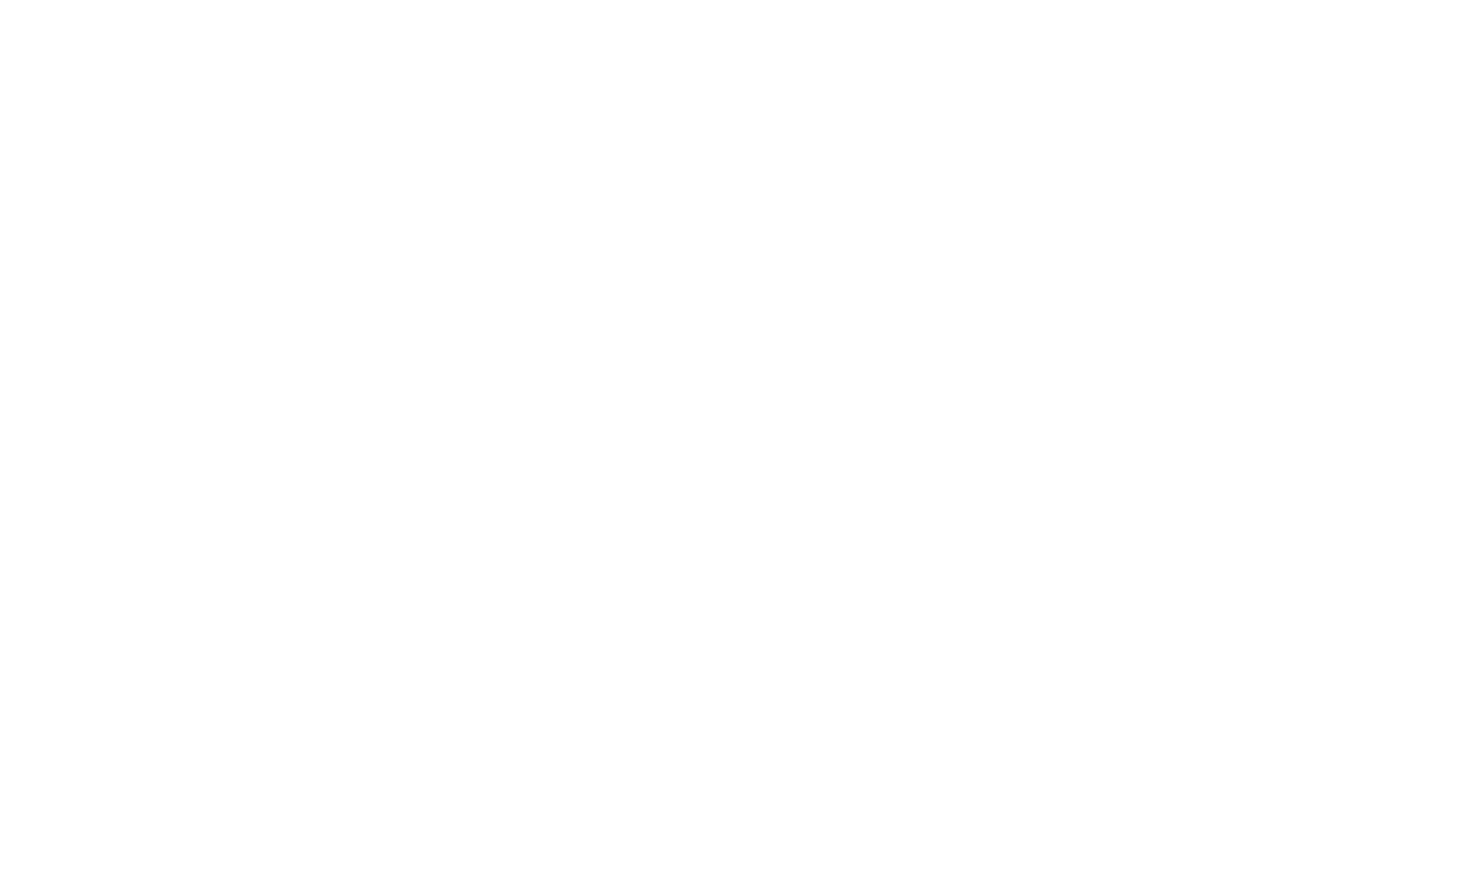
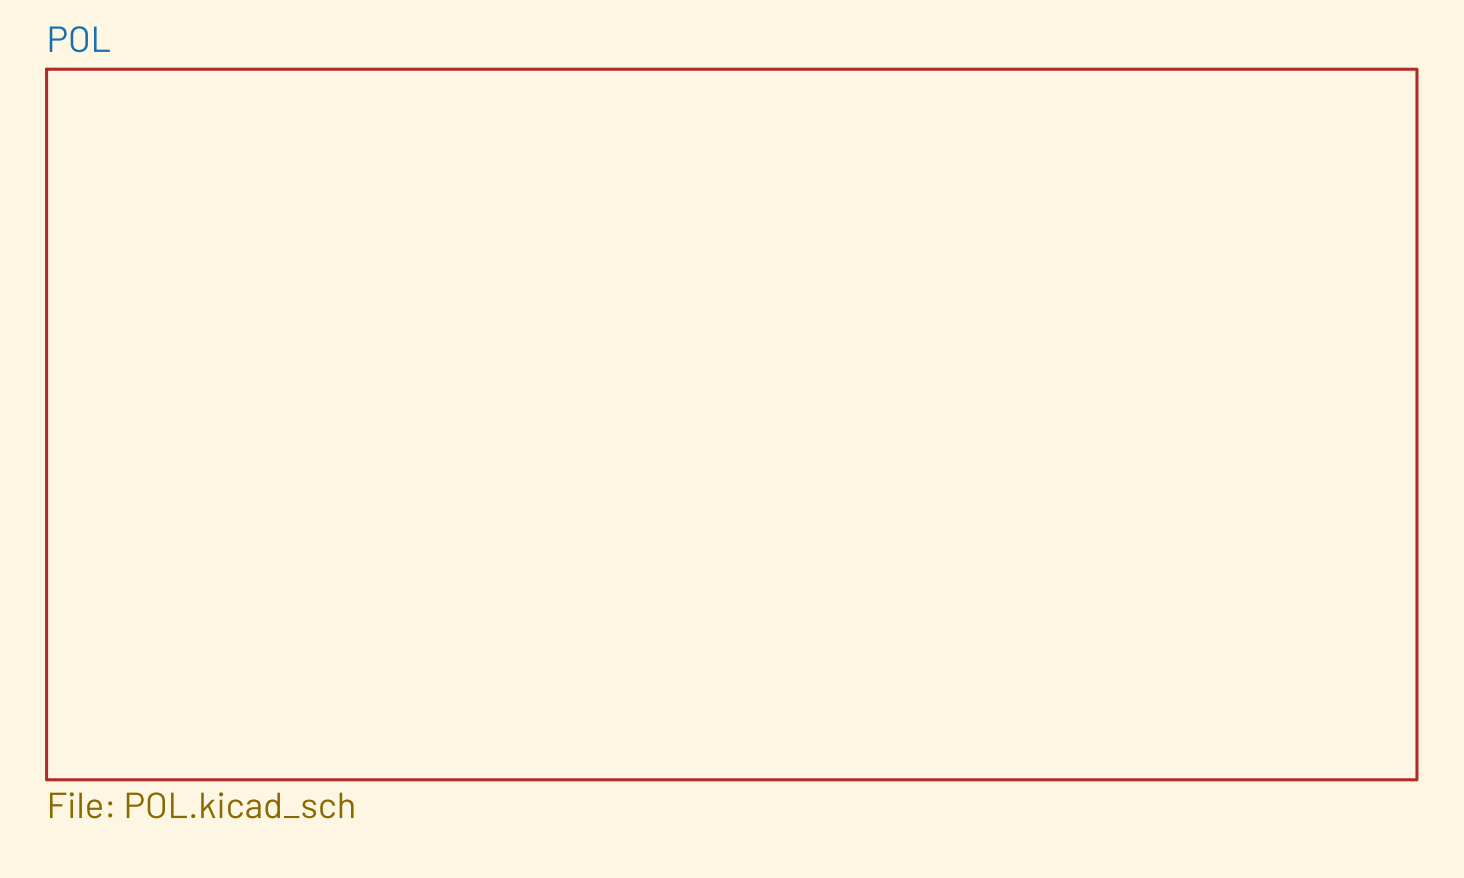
sheet POL: none -> File: POL.kicad_sch (731, 424)

